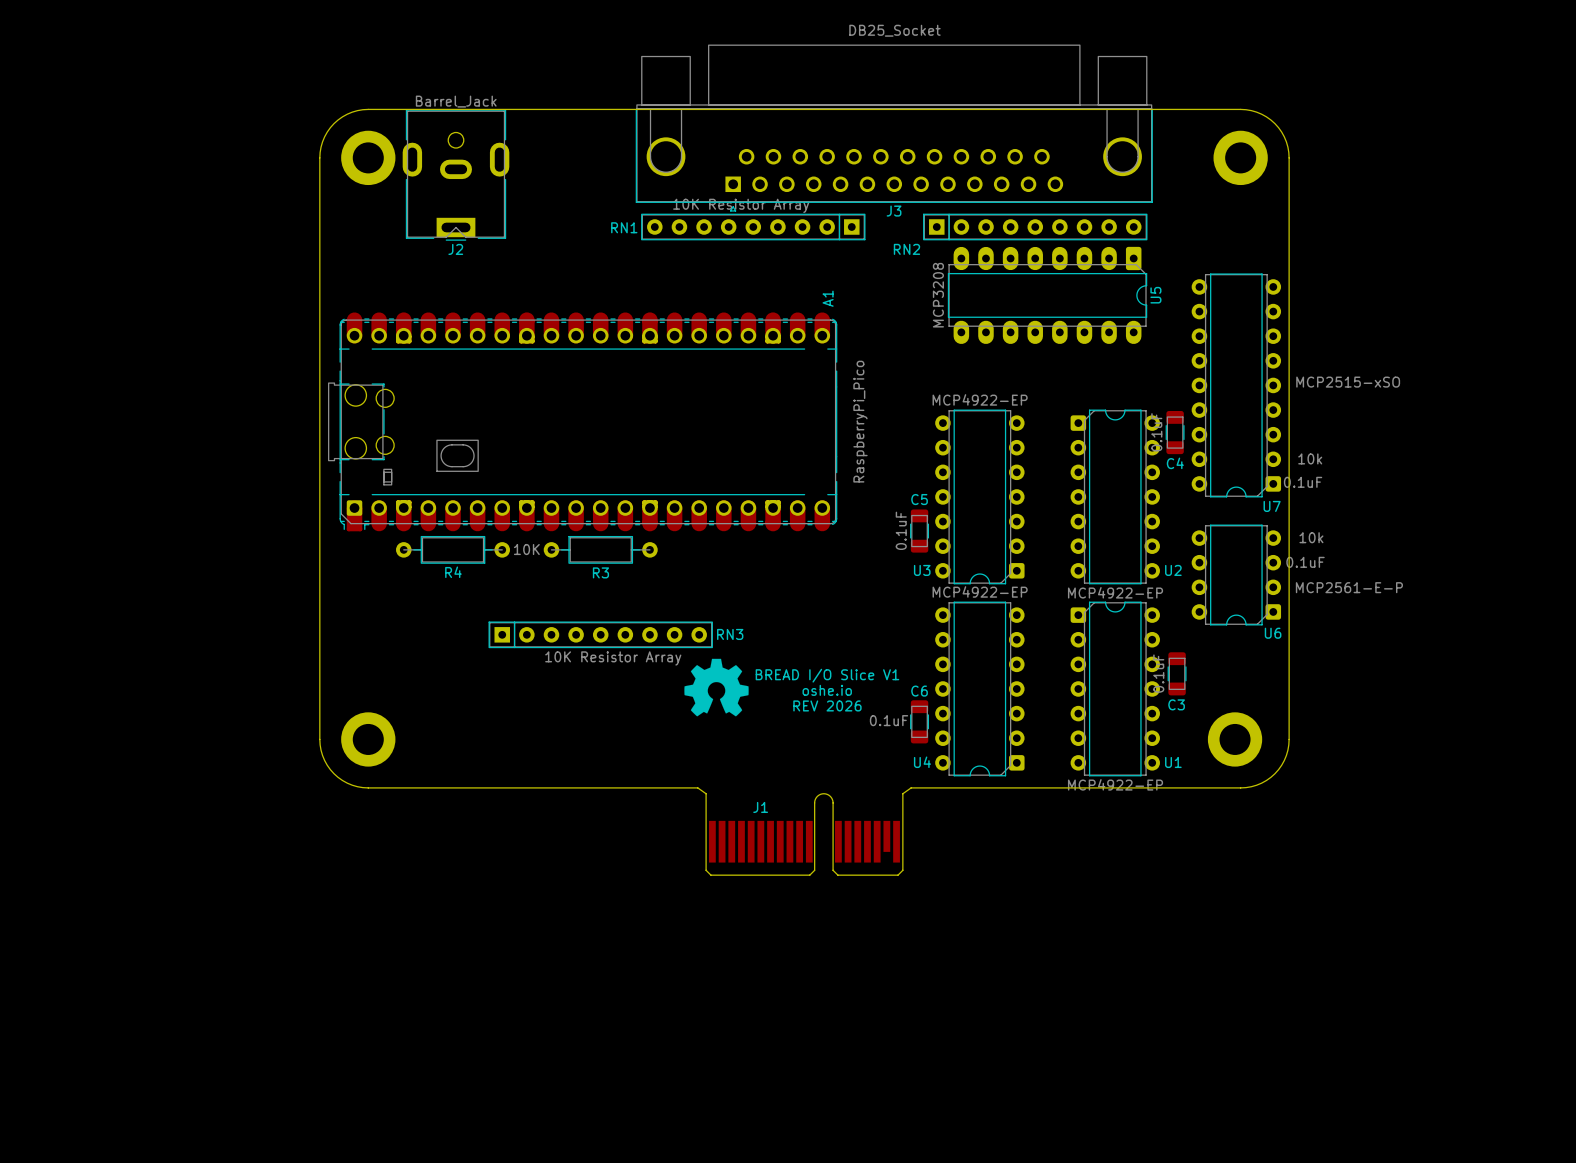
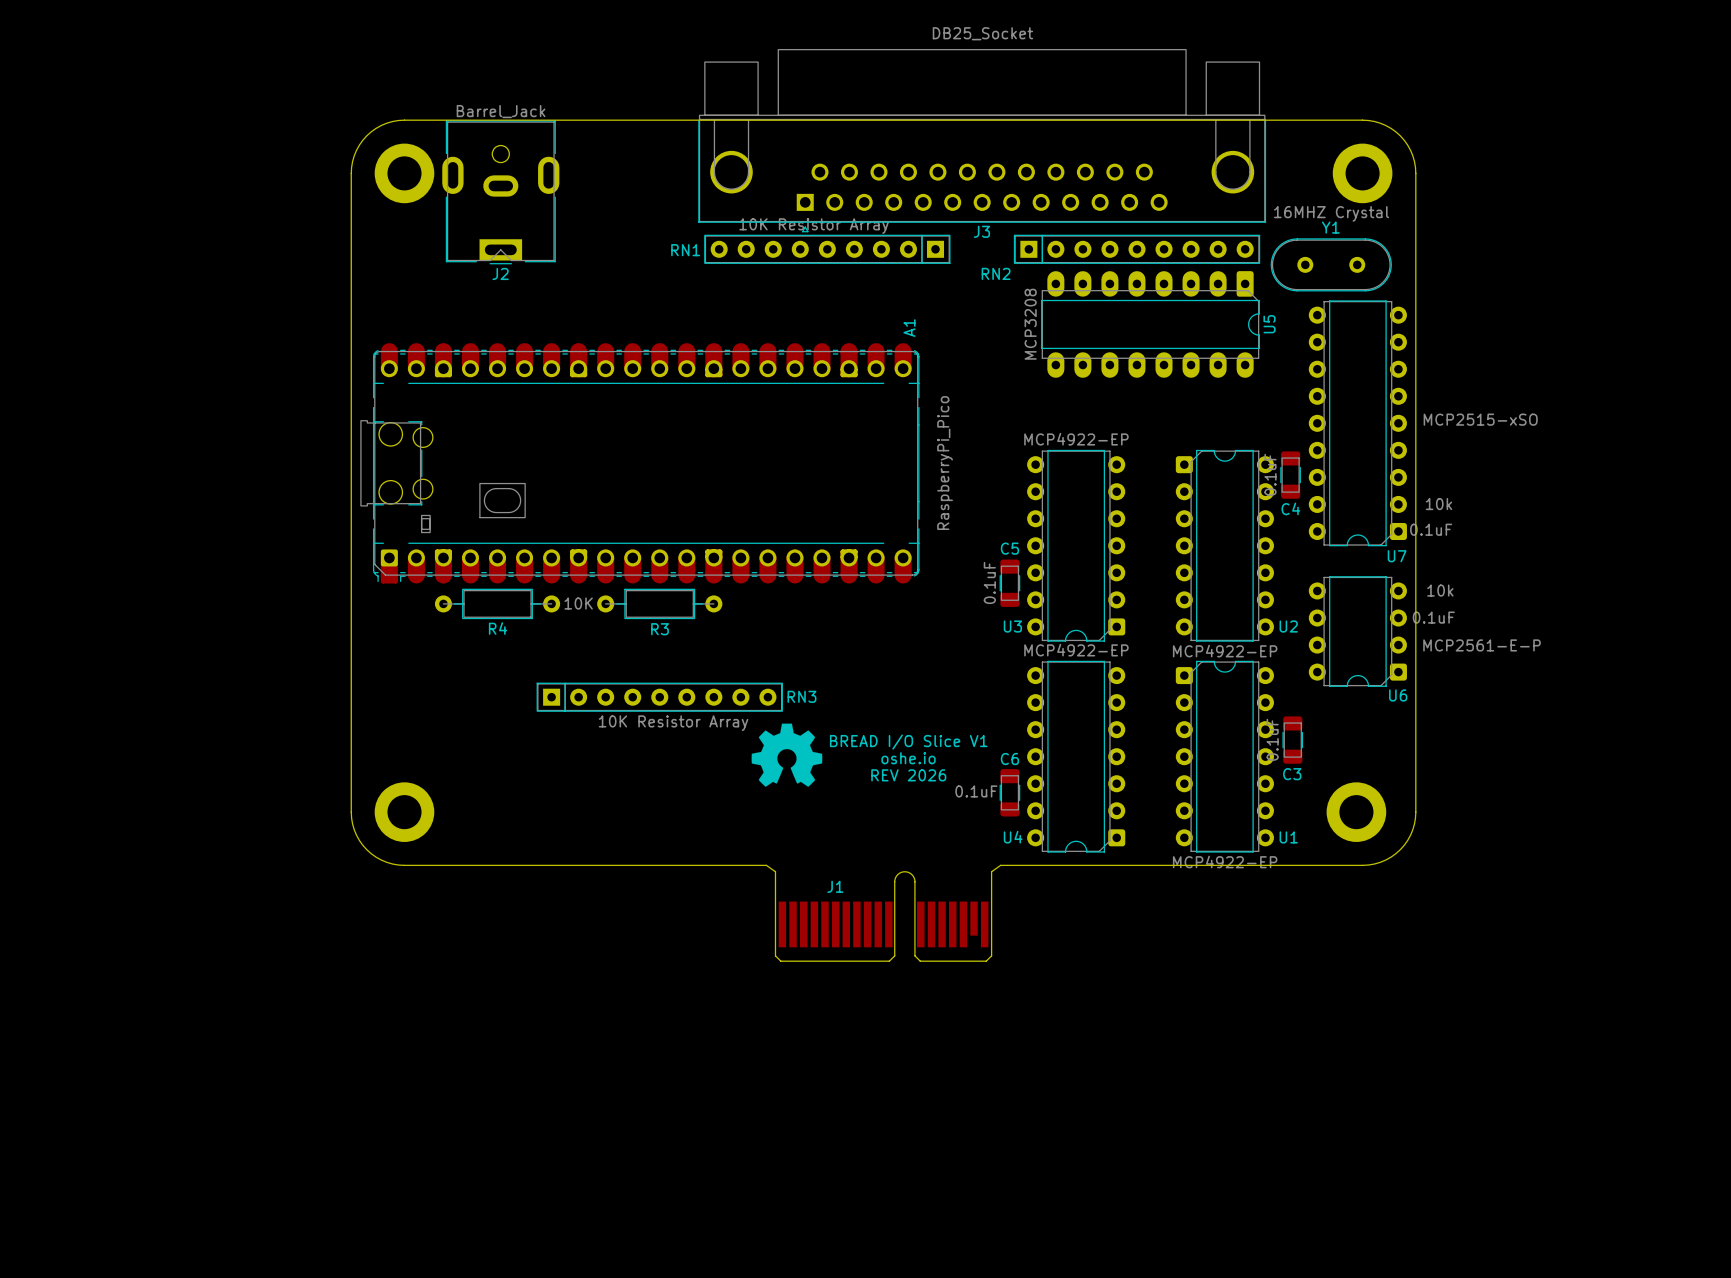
Y1: none -> 16MHZ Crystal (1331, 264)

